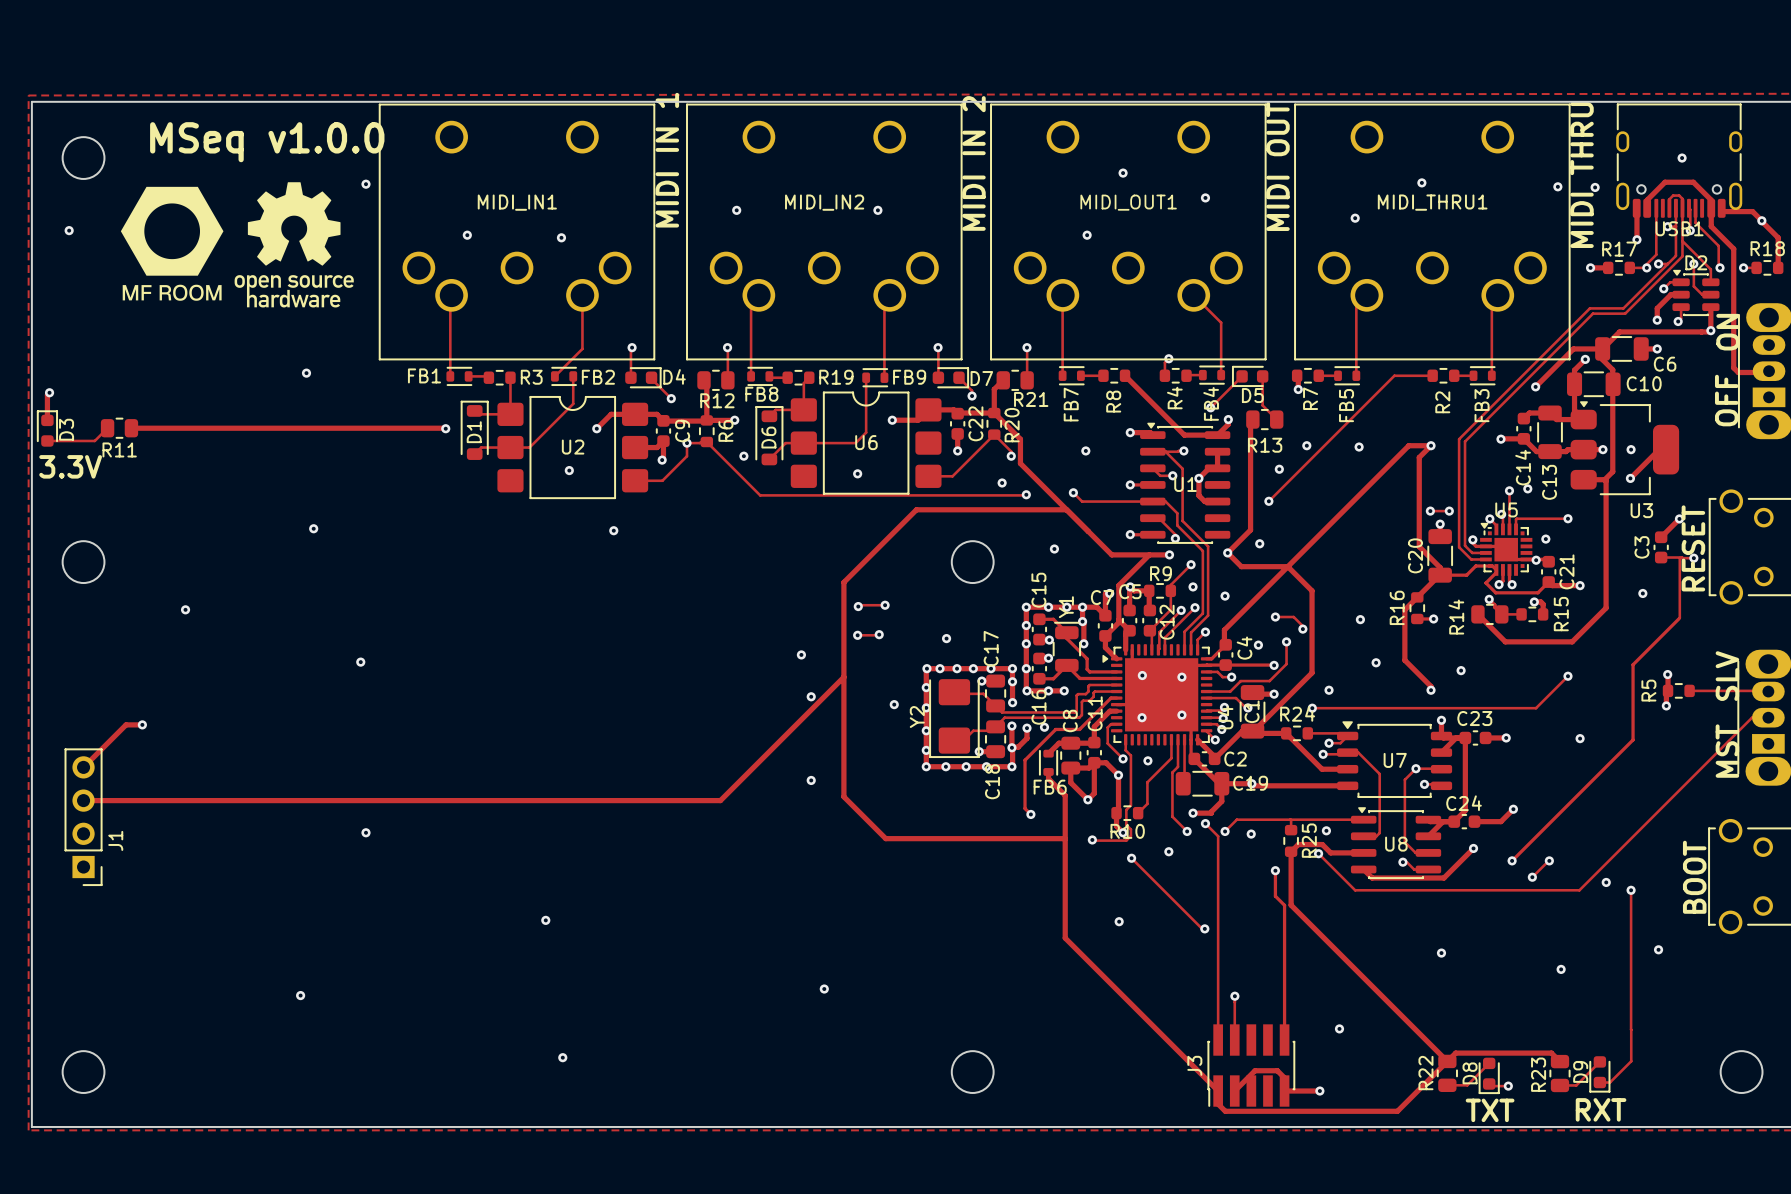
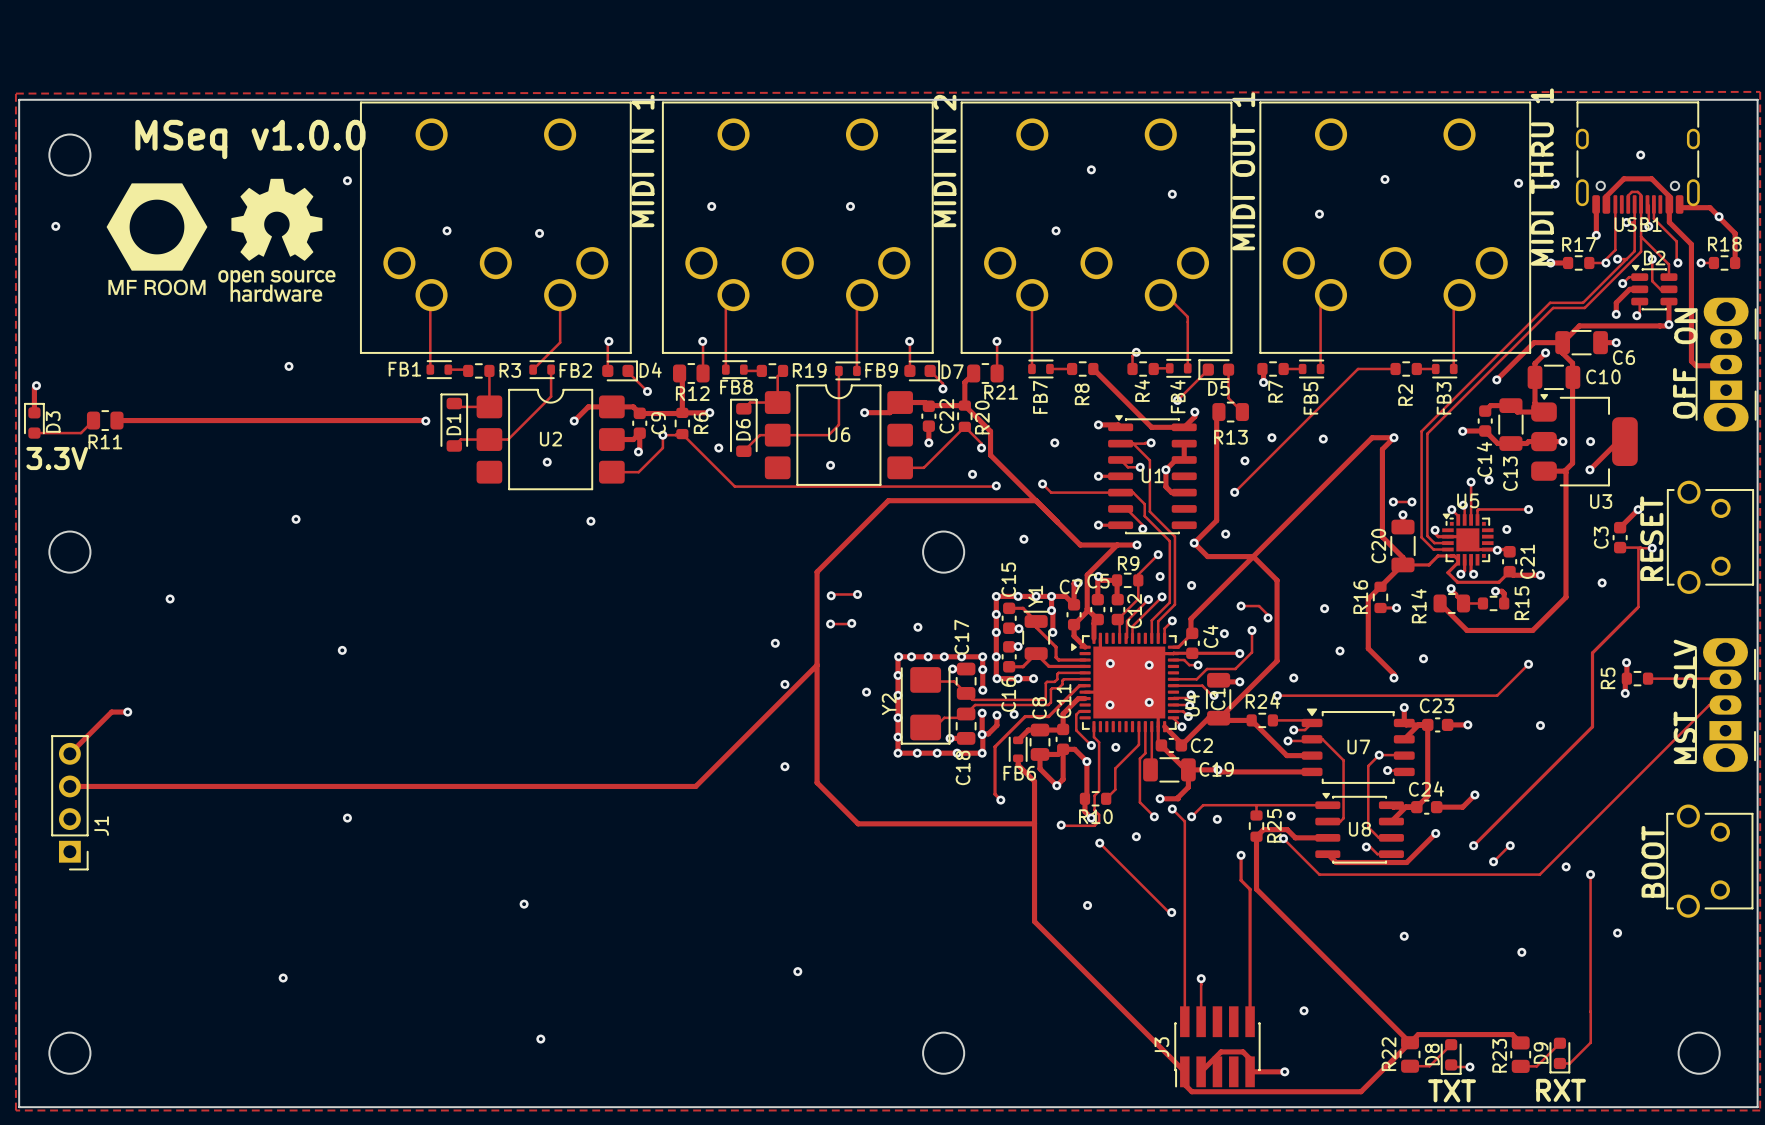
text: MIDI IN 1 (667, 160) -> none
text: MIDI IN 2 (973, 163) -> none
text: MIDI OUT (1277, 166) -> none
text: MIDI THRU (1581, 175) -> none
MIDI_IN1: (517, 231) -> none
MIDI IN 1: none -> (495, 227)
MIDI_IN2: (824, 231) -> none
MIDI IN 2: none -> (797, 227)
MIDI_OUT1: (1128, 231) -> none
MIDI OUT 1: none -> (1096, 227)
MIDI_THRU1: (1432, 231) -> none
MIDI THRU 1: none -> (1395, 227)

